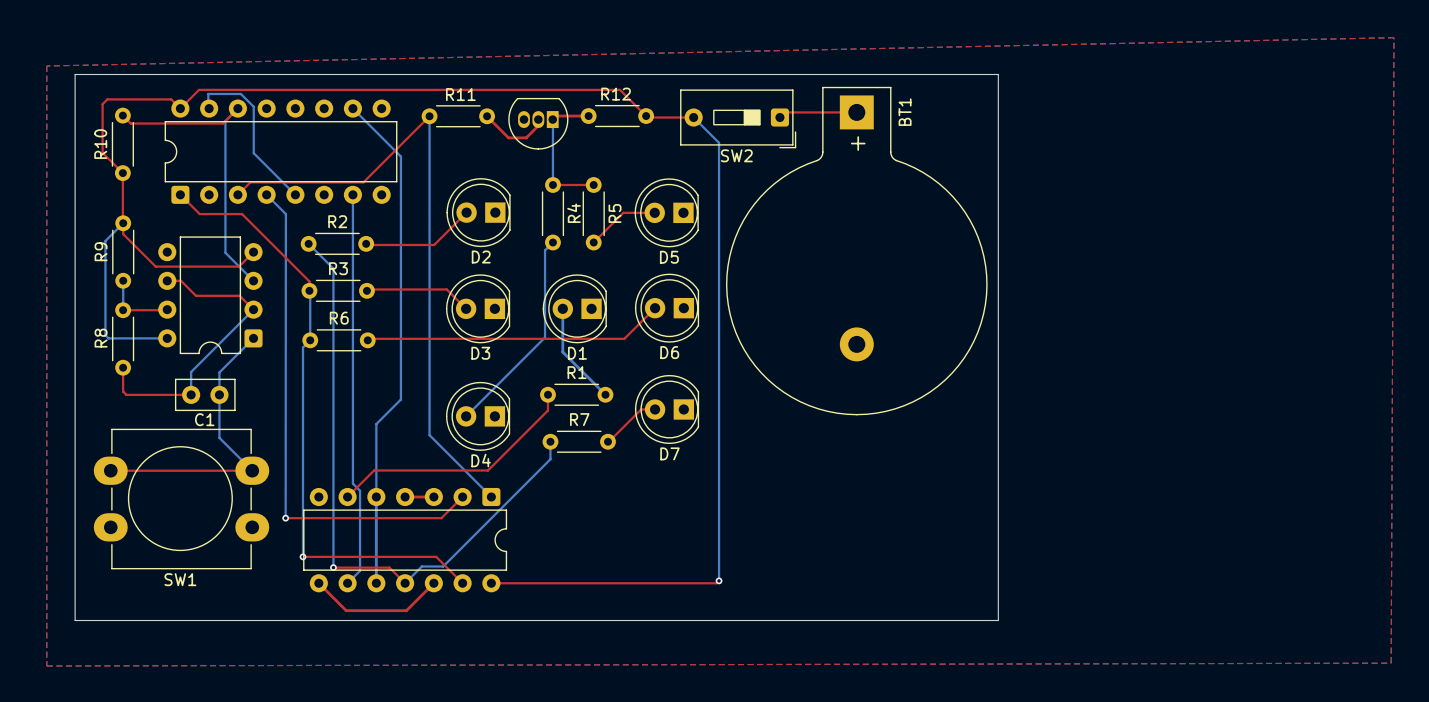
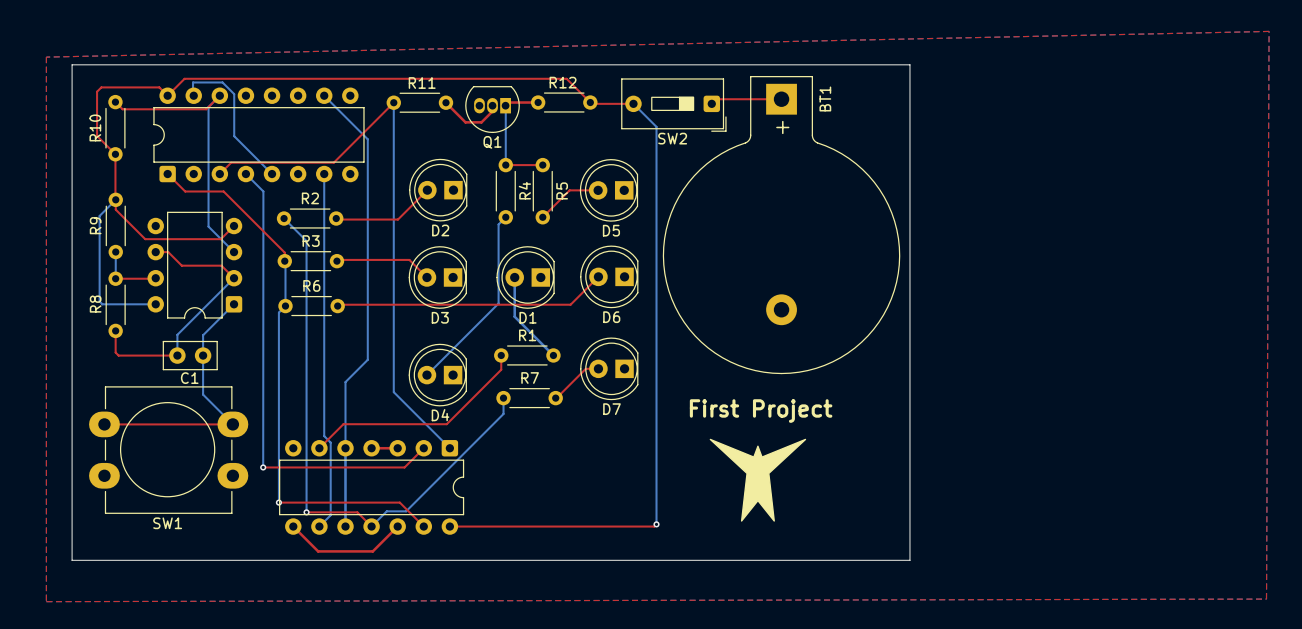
Q1 name: none -> Q1 (492, 142)
text: none -> First Project (761, 411)
drawing: none -> [709, 438, 807, 522]

